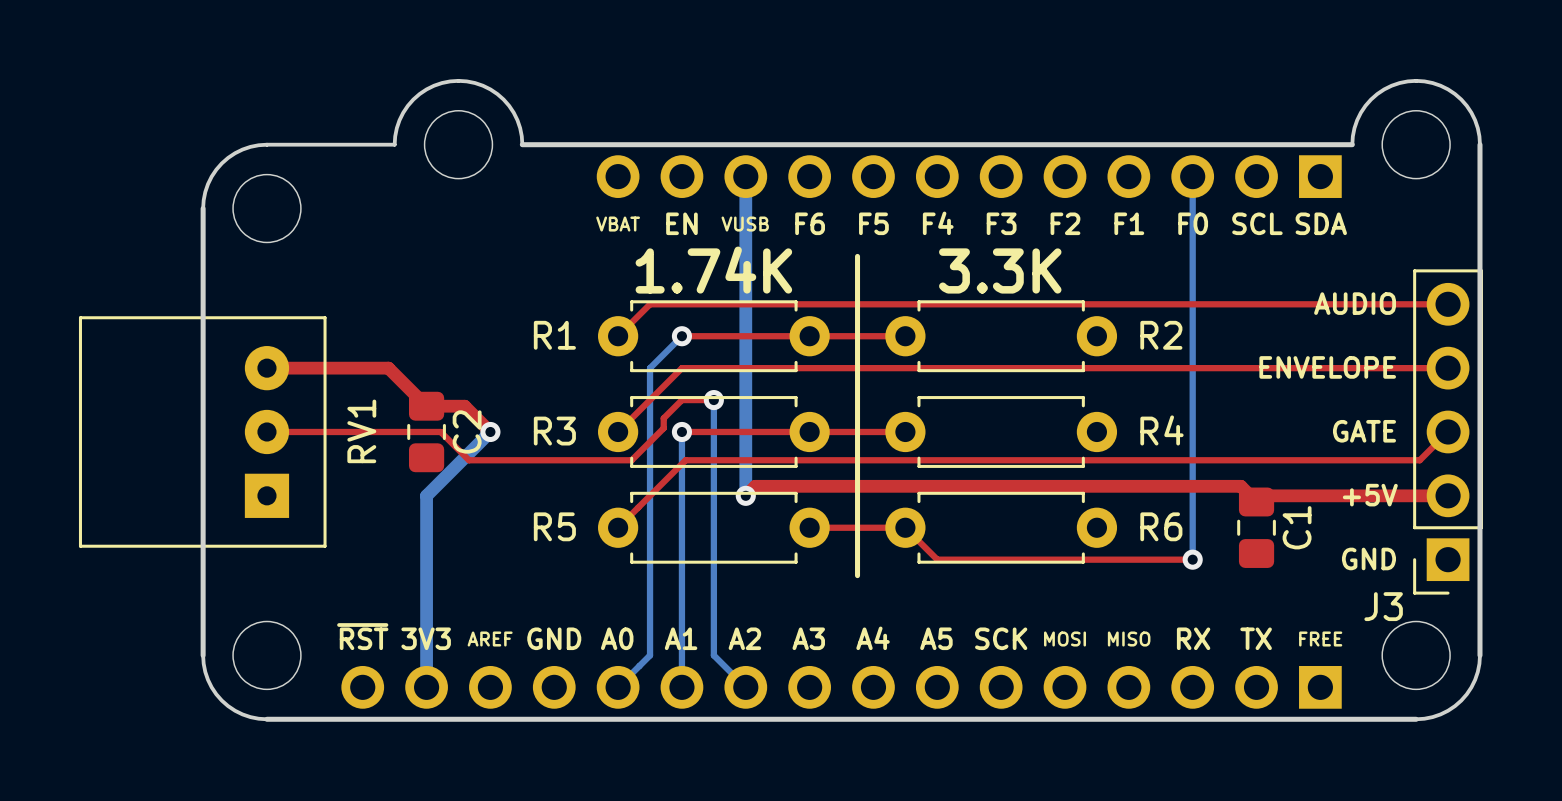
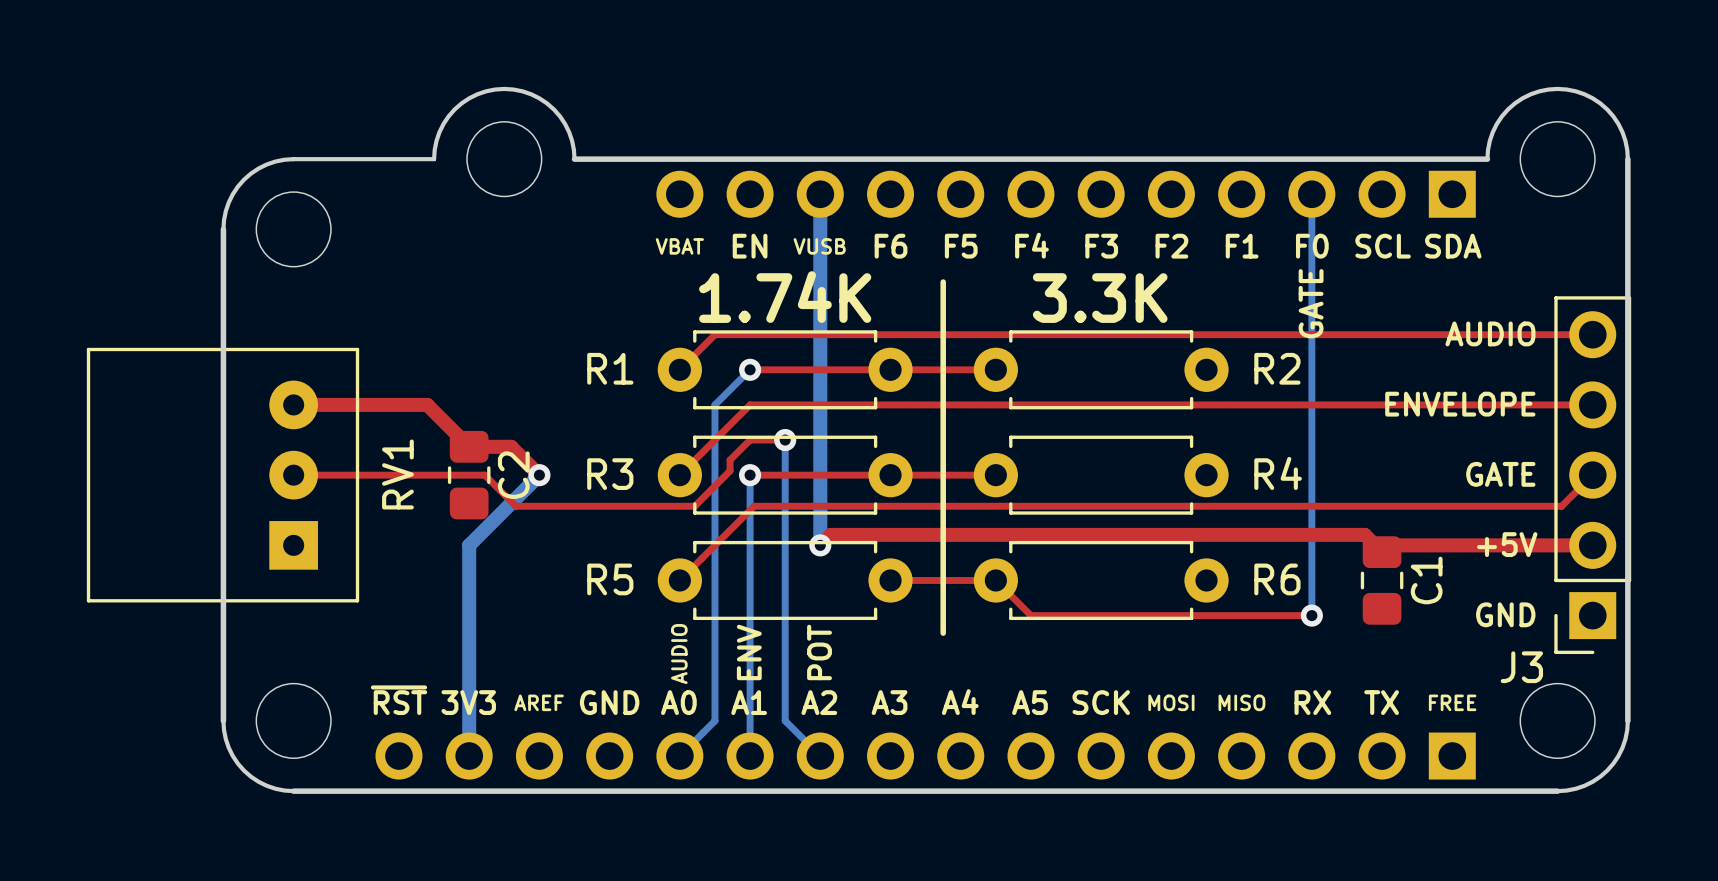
text: none -> GATE (1311, 303)
text: none -> ENV (749, 652)
text: none -> POT (819, 652)
text: none -> AUDIO (679, 654)

